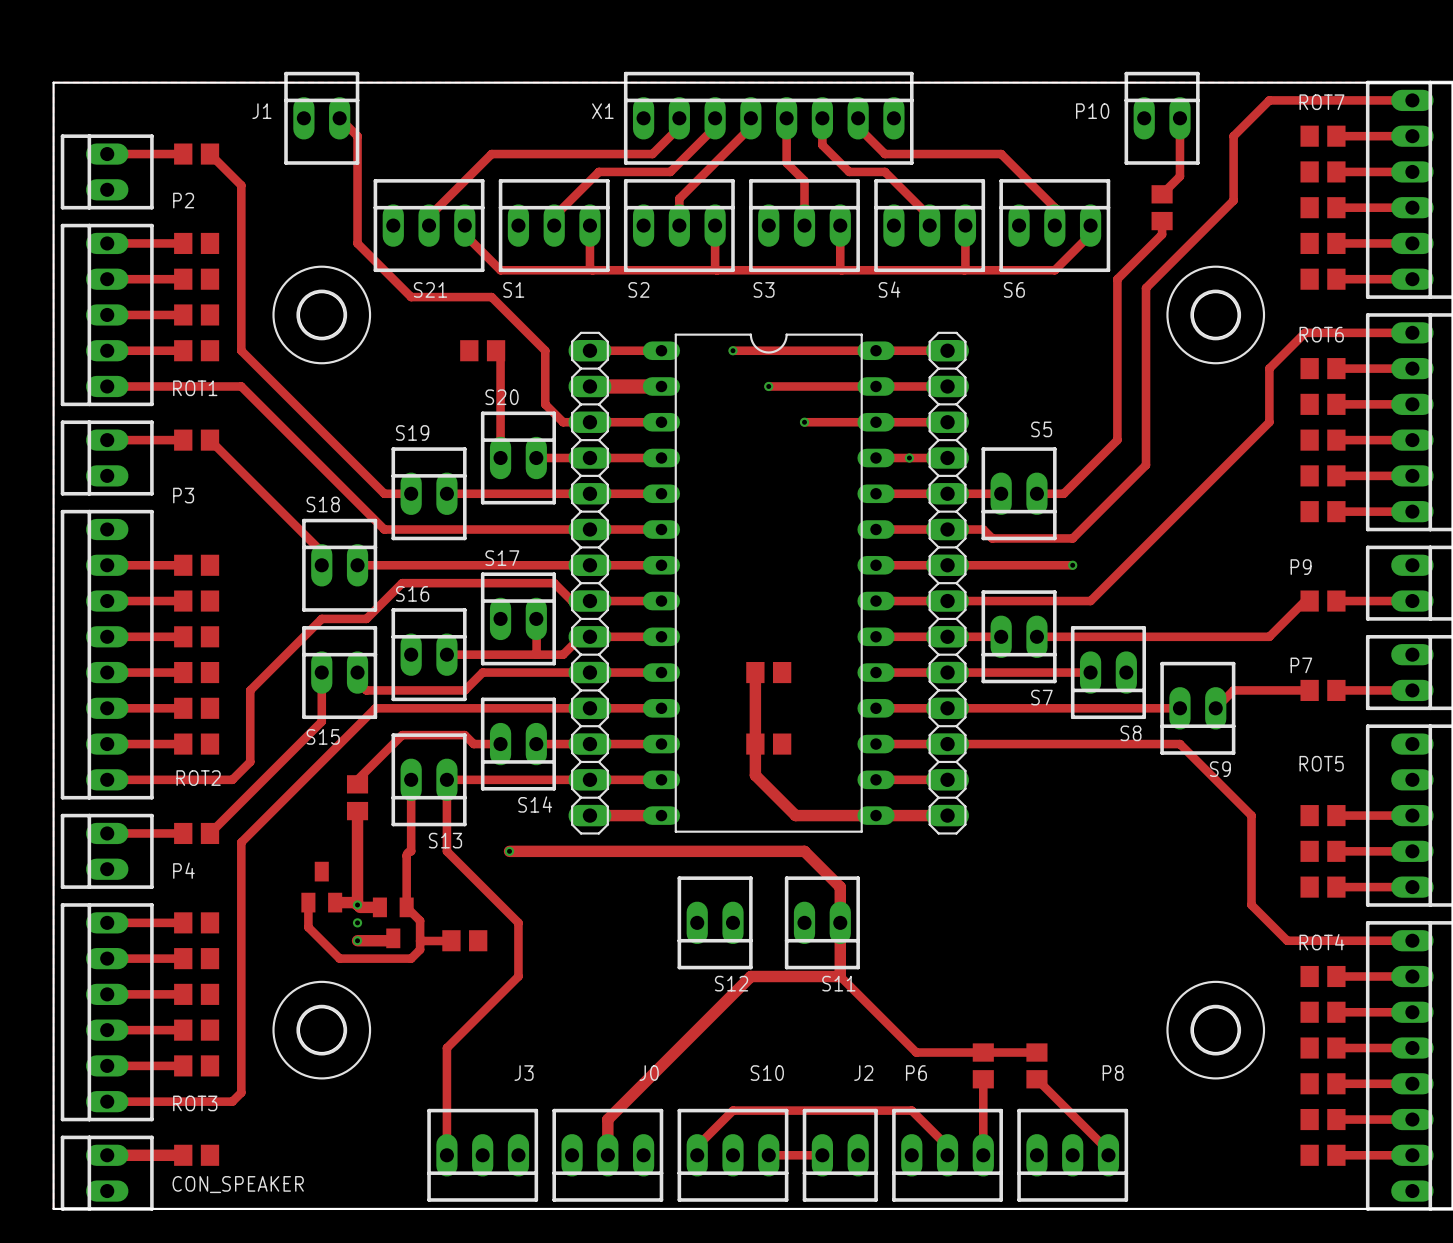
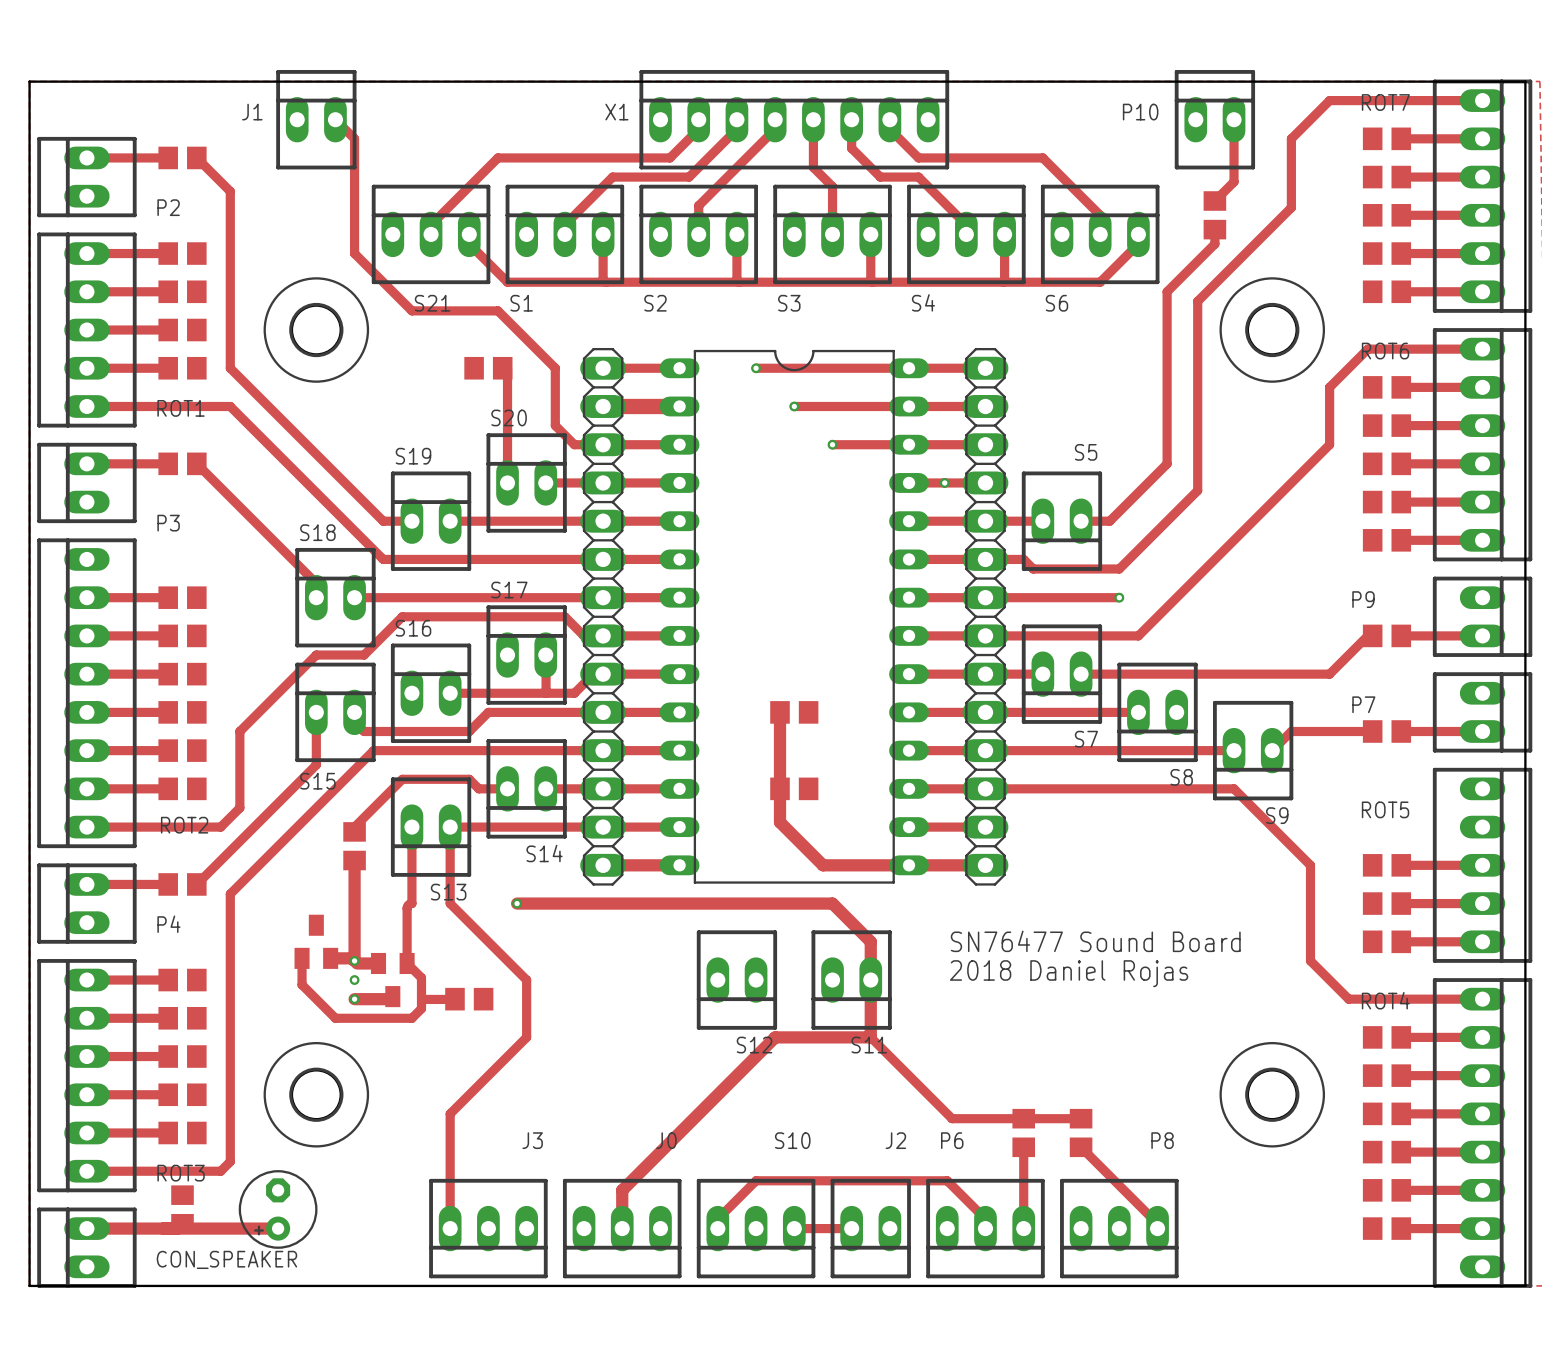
text: none -> SN76477 Sound Board (1095, 941)
text: none -> 2018 Daniel Rojas (1069, 973)
part: none -> (278, 1209)
track: none -> (168, 1228) (278, 1228)
part rotation: 0° (196, 1155) -> 90° clockwise (182, 1209)

